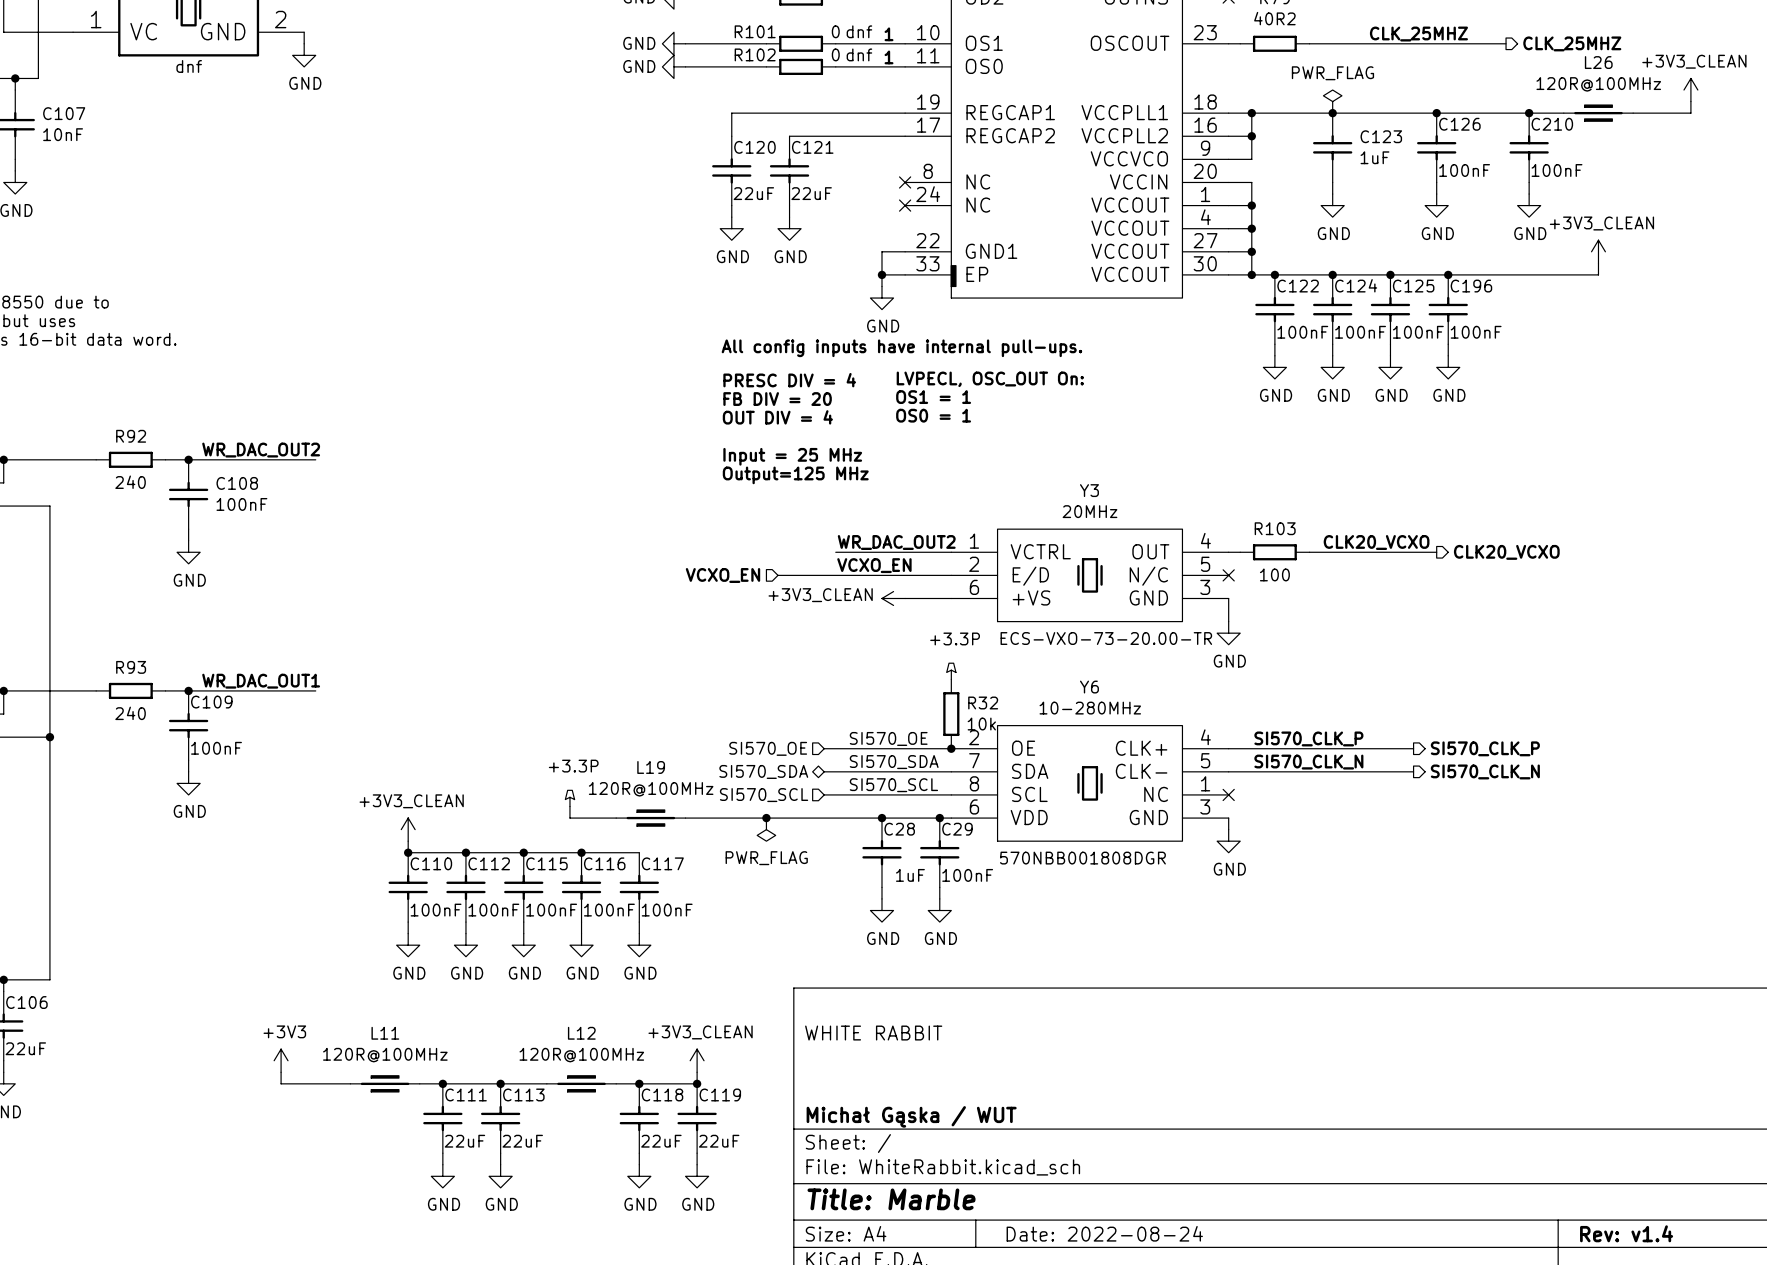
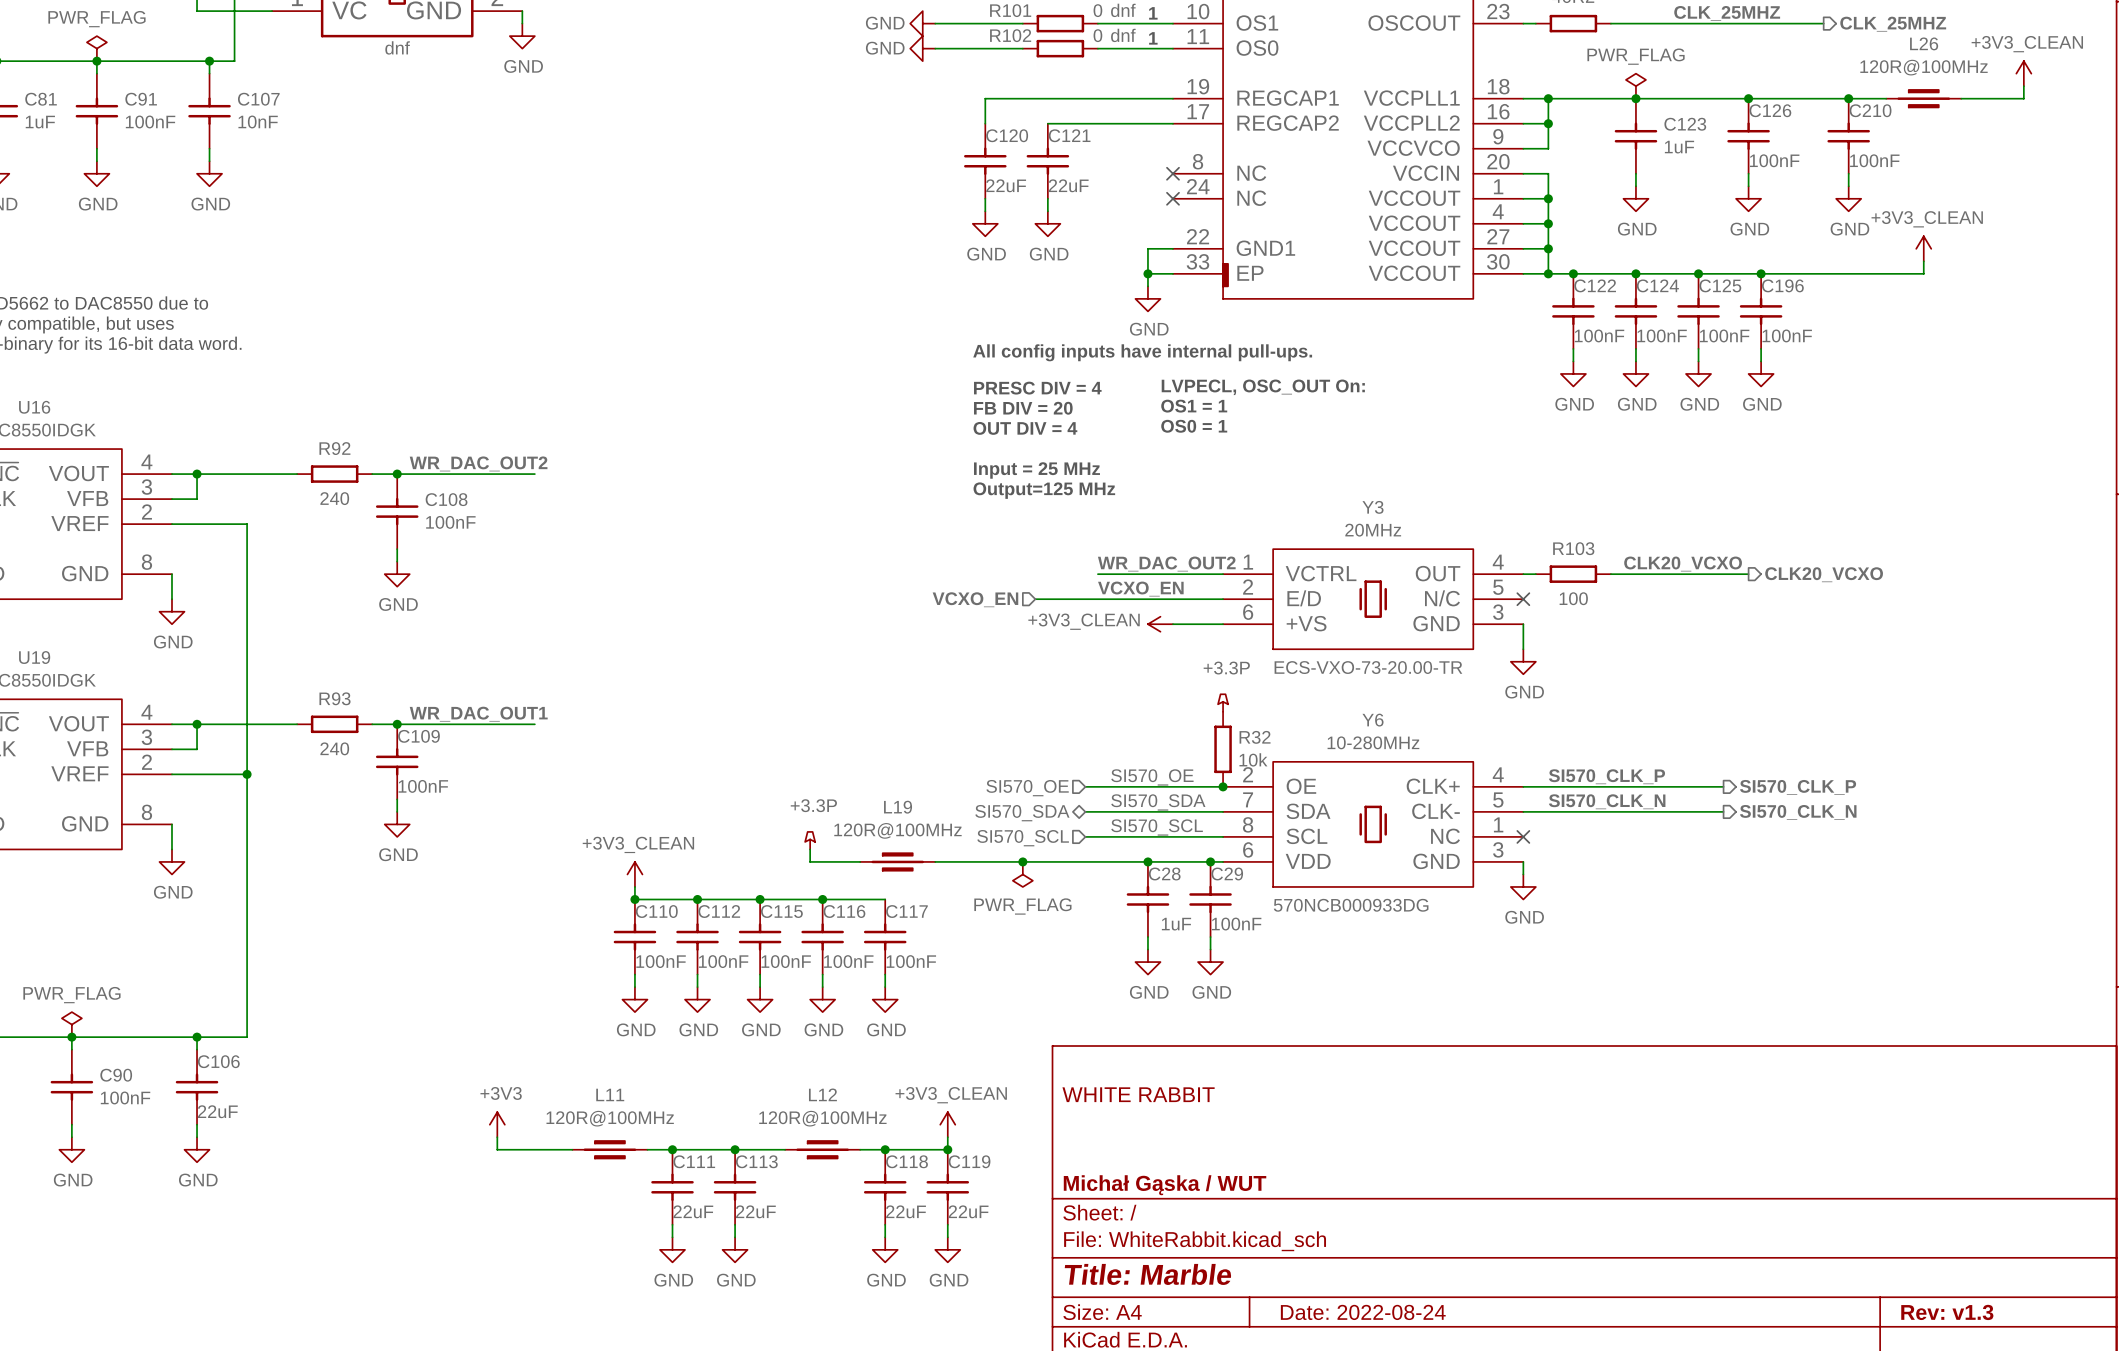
Y6 text: 570NBB001808DGR (1082, 858) -> 570NCB000933DG (1351, 905)
title block: Rev: v1.4 (1626, 1233) -> Rev: v1.3 (1947, 1312)

